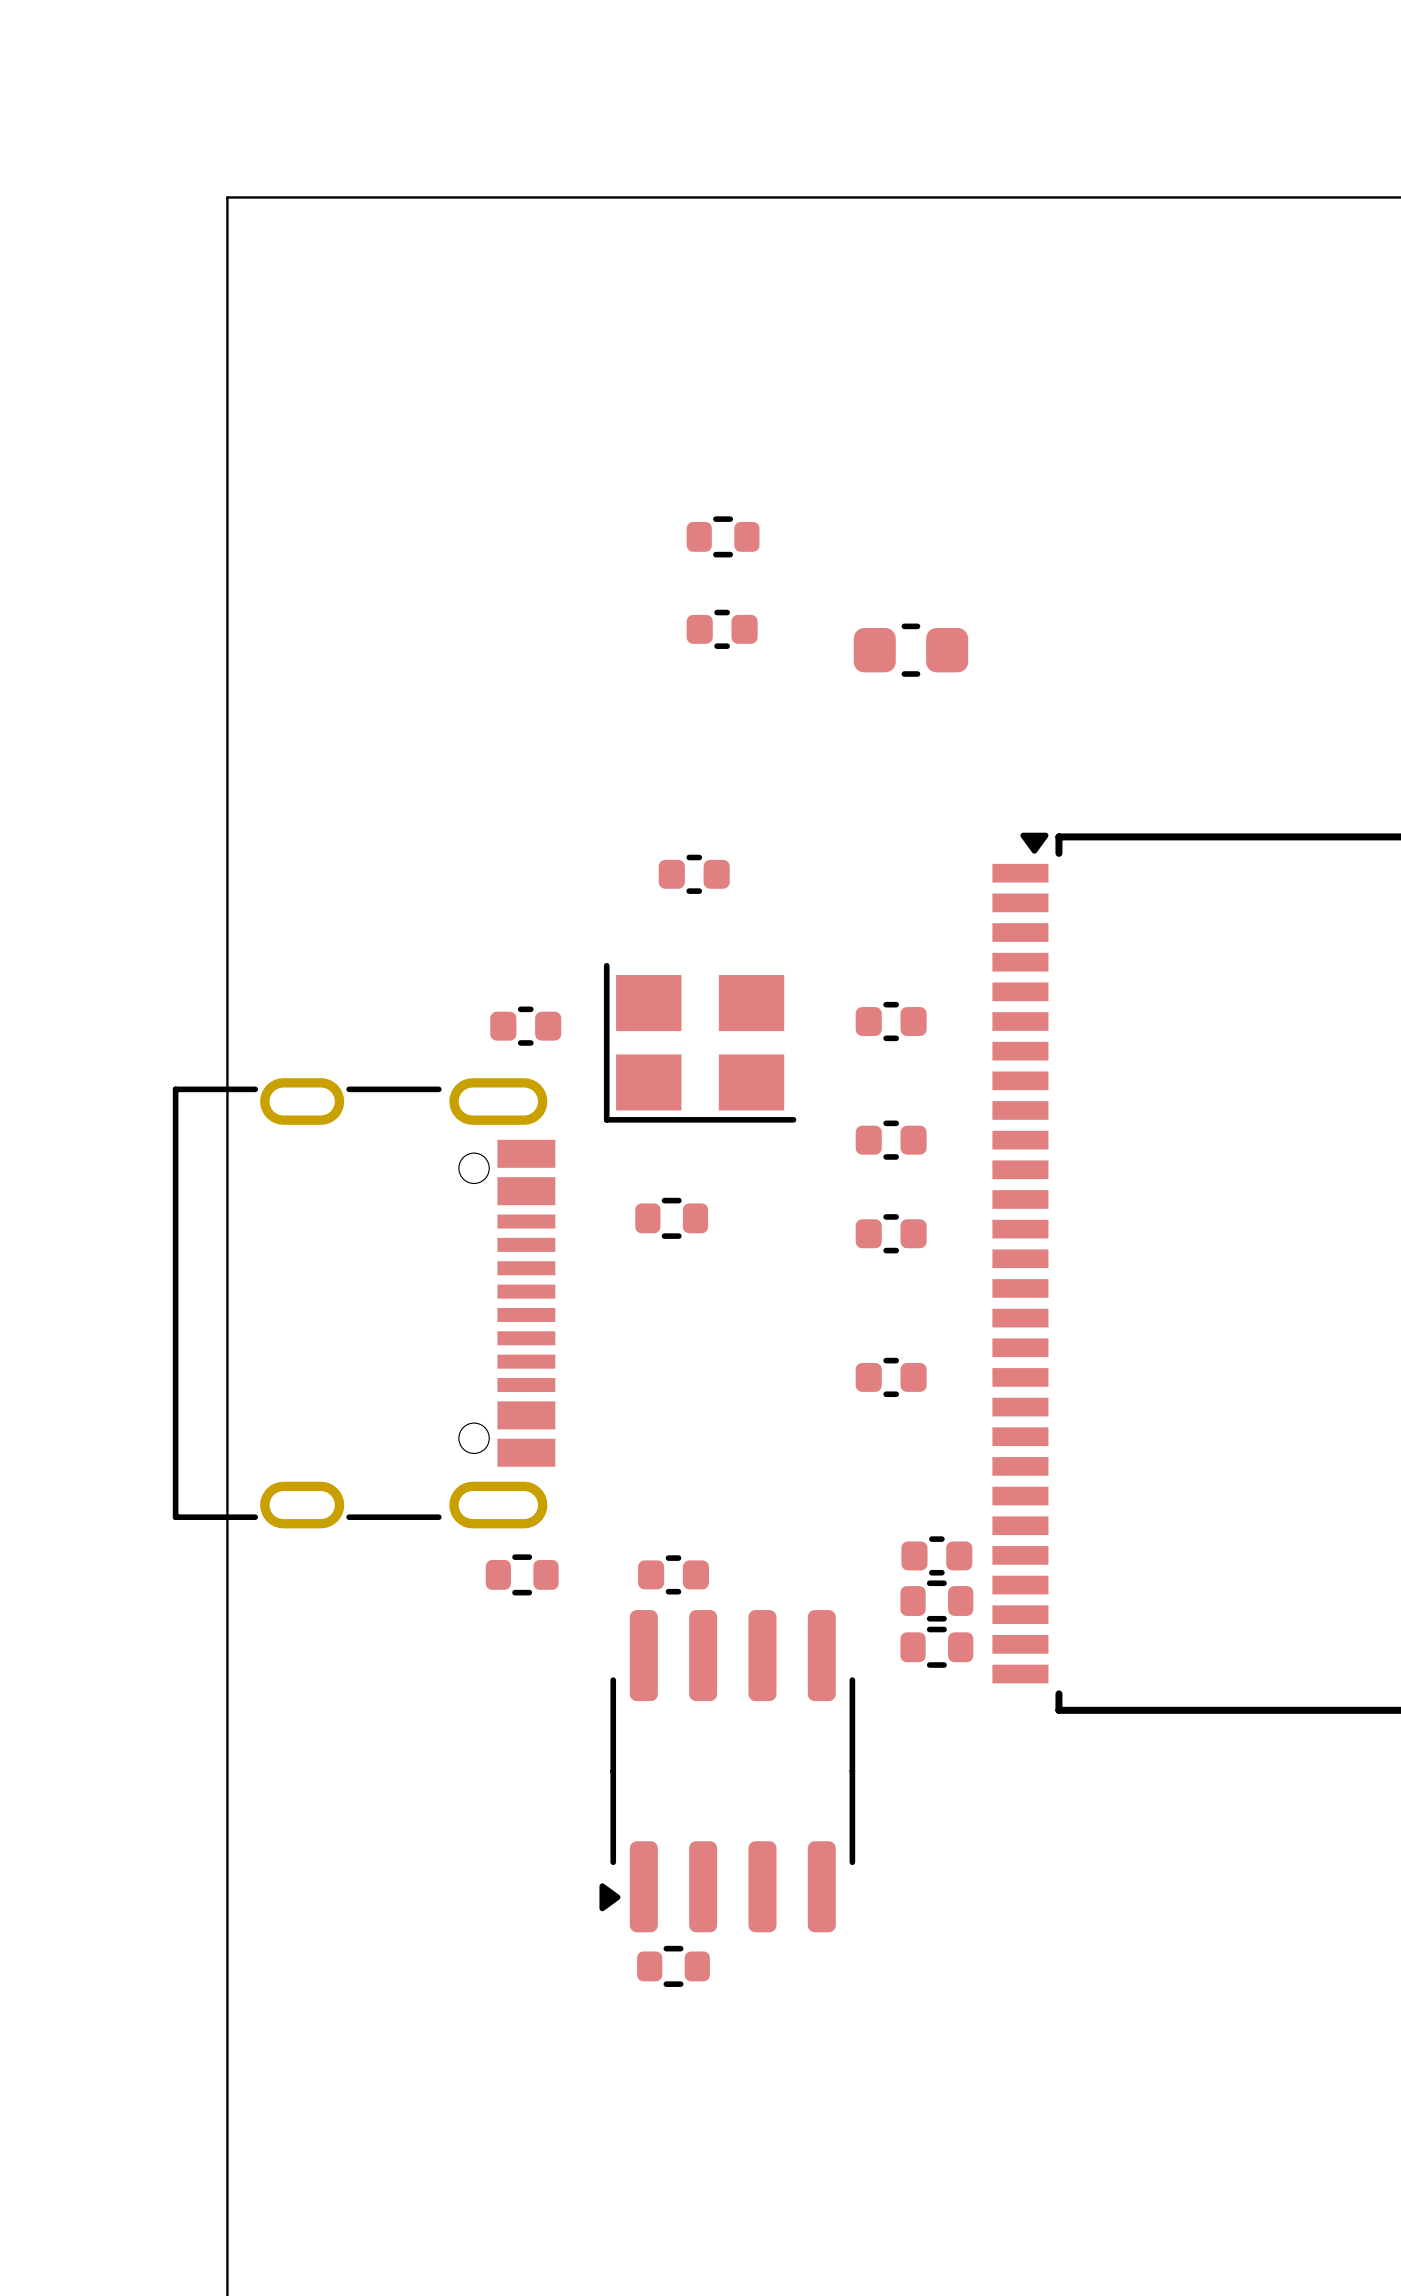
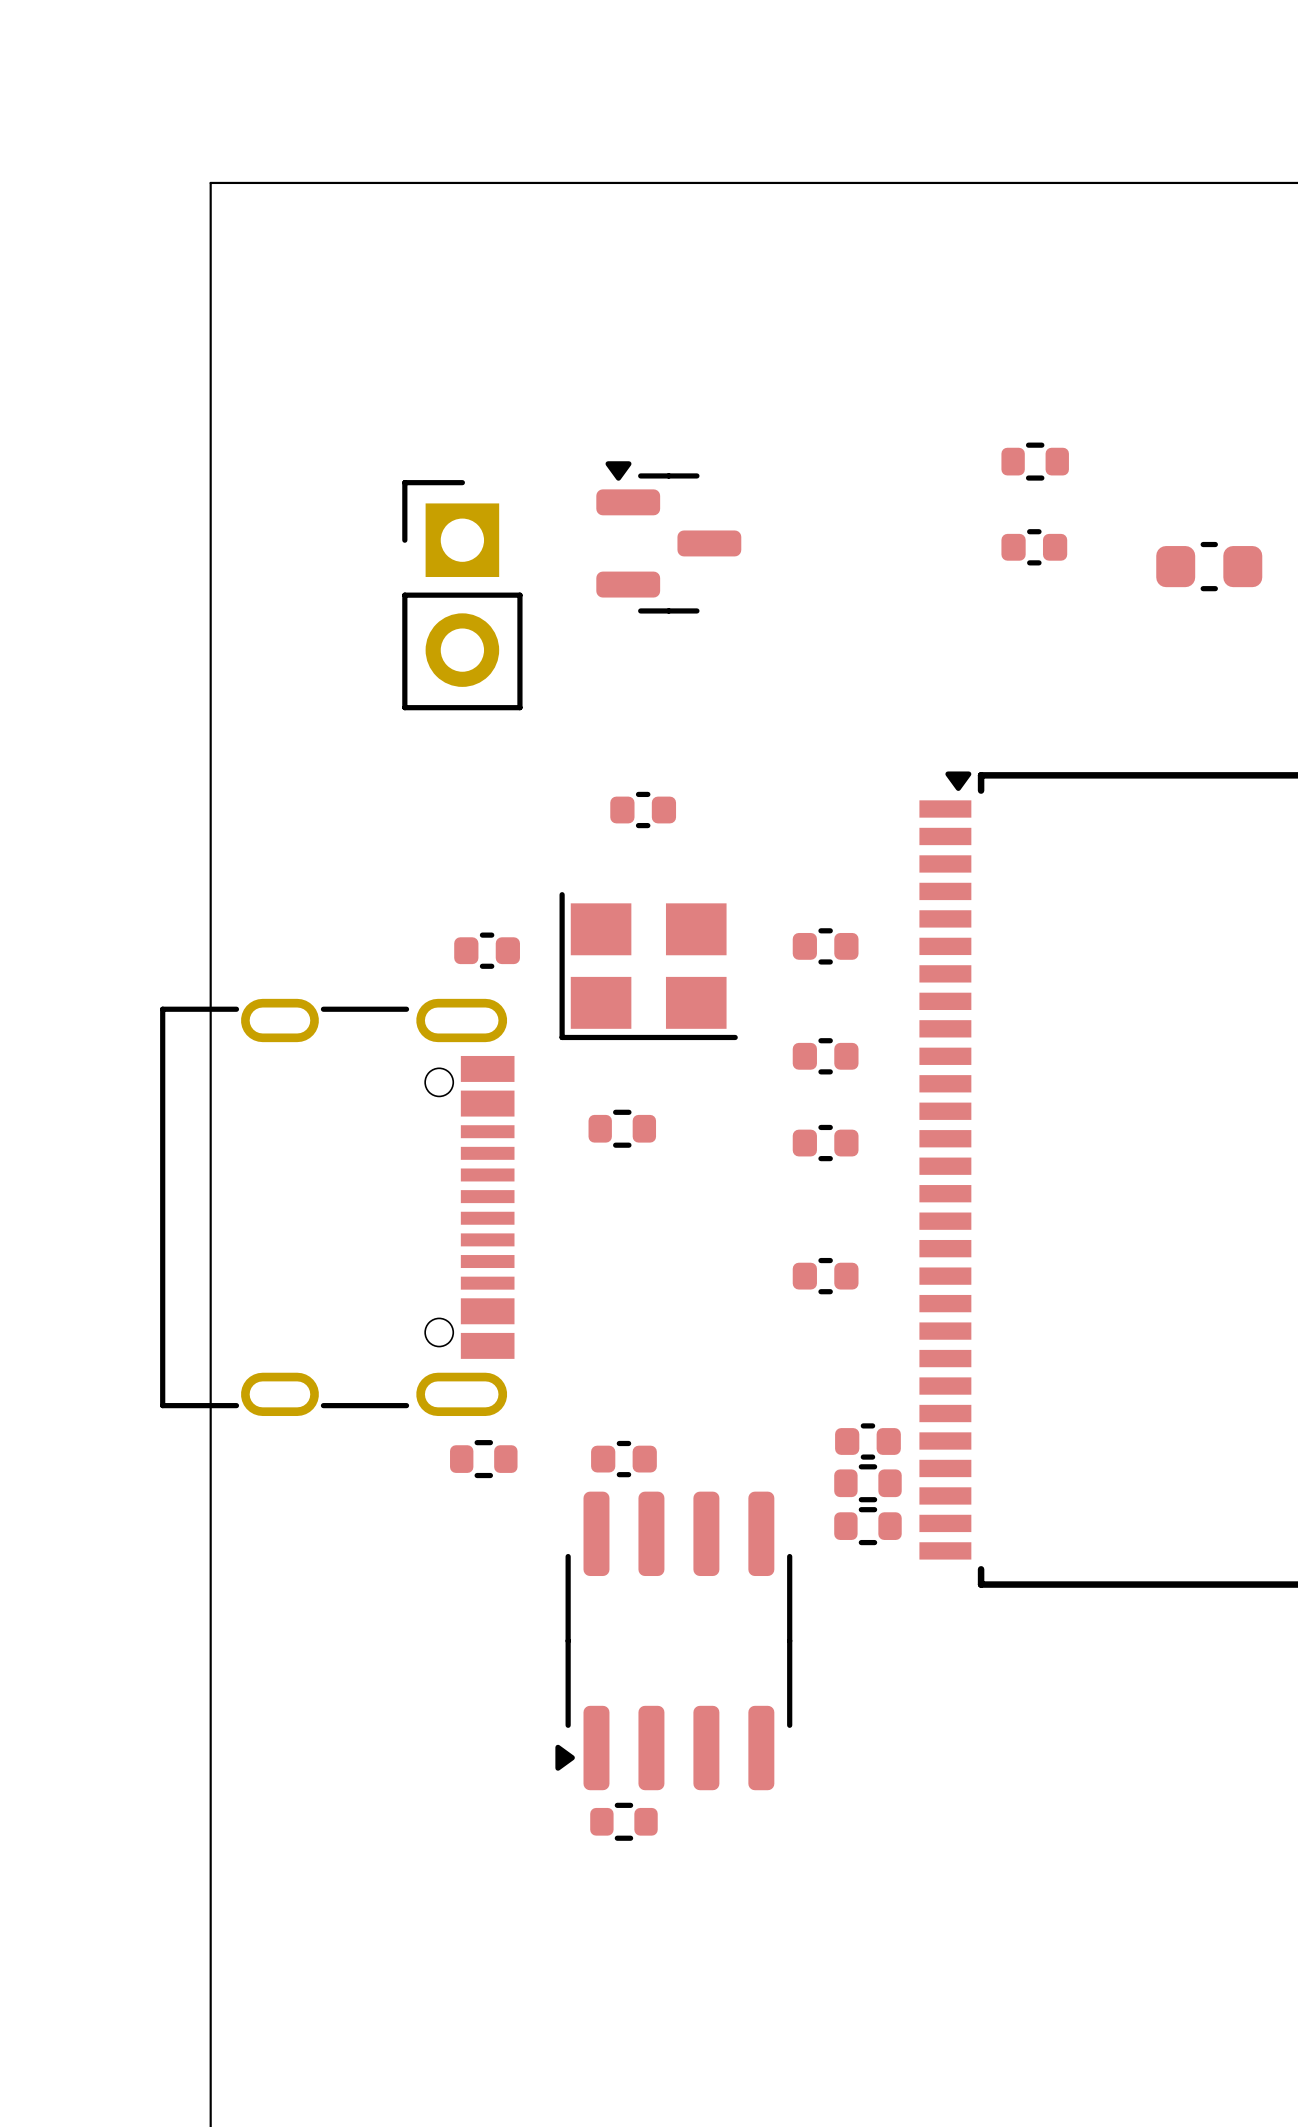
part position: (723, 536) -> (1035, 461)
part: none -> (668, 537)
part position: (722, 629) -> (1034, 547)
part: none -> (462, 595)
part position: (910, 650) -> (1209, 566)

